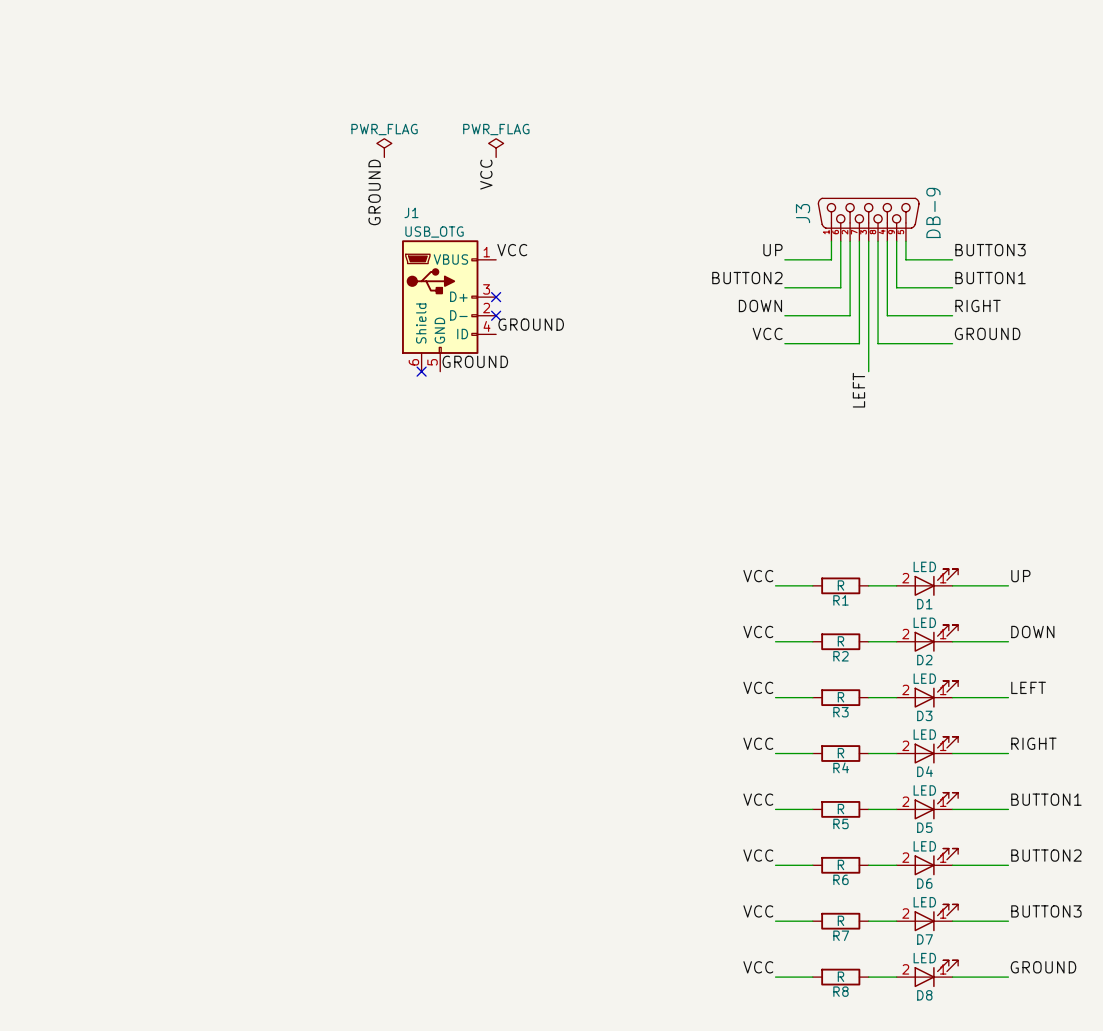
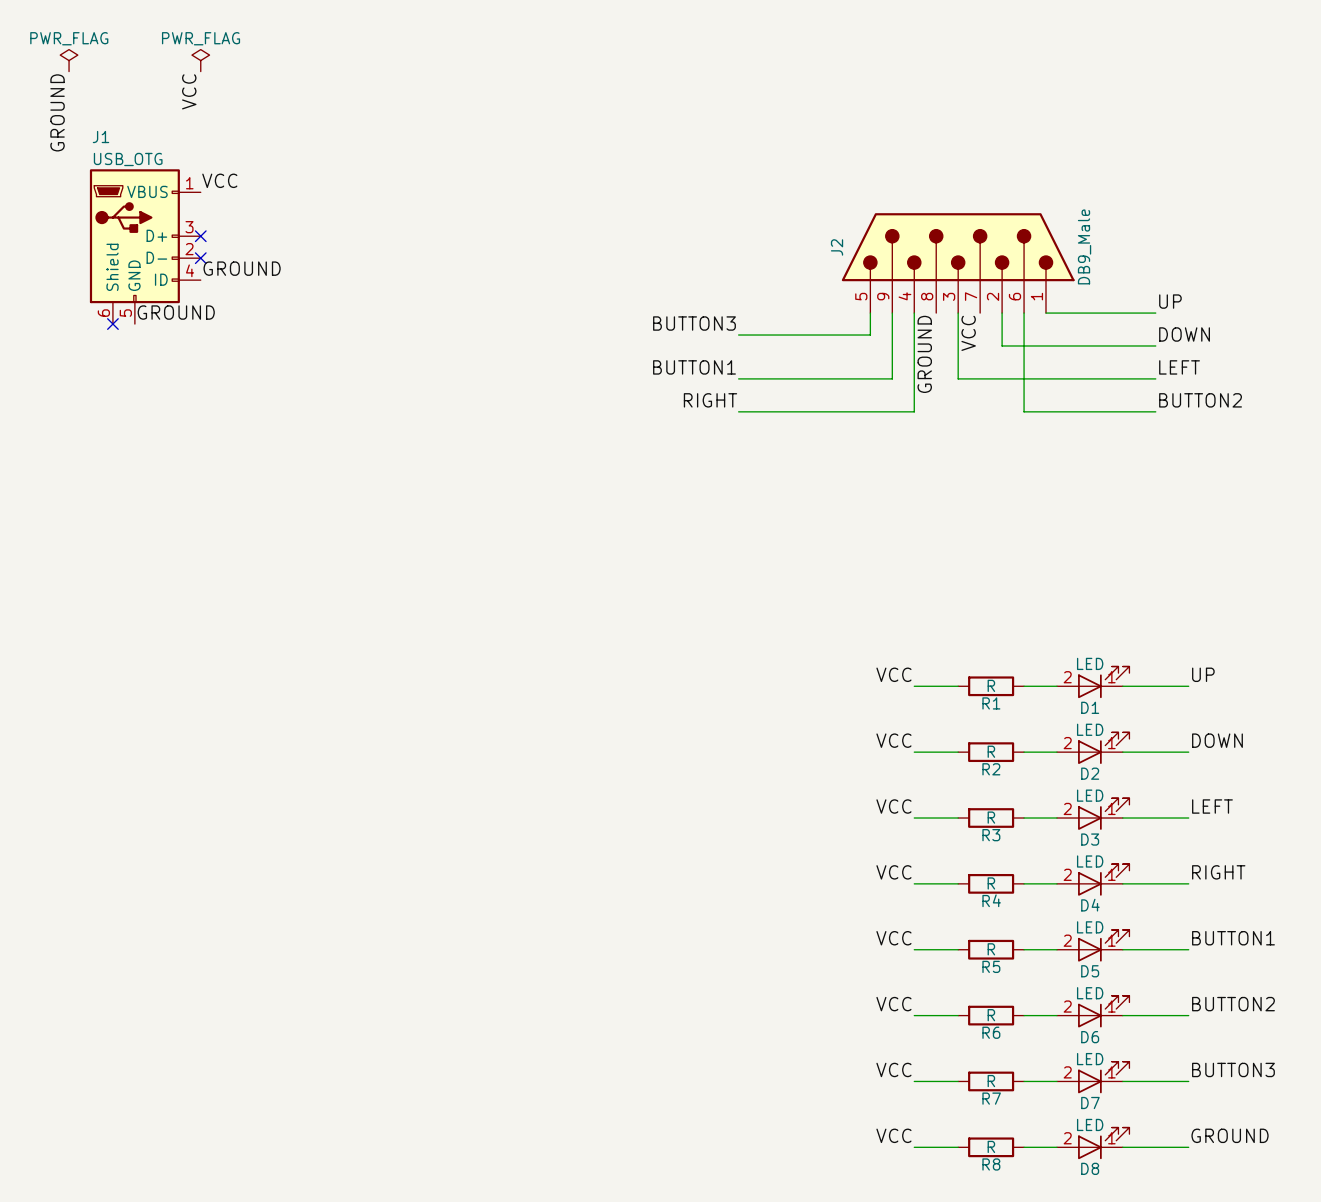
power symbol: none -> PWR_FLAG (69, 60)
power symbol: none -> PWR_FLAG (200, 60)
label: none -> VCC (189, 91)
label: none -> GROUND (57, 112)
power symbol: PWR_FLAG (384, 148) -> none
power symbol: PWR_FLAG (496, 148) -> none
label: none -> VCC (219, 180)
label: VCC (486, 174) -> none
label: GROUND (374, 192) -> none
no-connect mark: none -> (200, 236)
J3: DB-9 (868, 219) -> none
no-connect mark: none -> (200, 258)
J2: none -> DB9_Male (958, 263)
label: none -> GROUND (242, 268)
wire: (831, 241) (831, 259) (784, 259) -> none
wire: (840, 241) (840, 287) (784, 287) -> none
wire: (859, 241) (859, 343) (784, 343) -> none
wire: (878, 241) (878, 343) (952, 343) -> none
wire: (887, 241) (887, 315) (952, 315) -> none
wire: (896, 241) (896, 287) (952, 287) -> none
wire: (905, 241) (905, 259) (952, 259) -> none
label: VCC (512, 250) -> none
label: UP (772, 250) -> none
label: BUTTON3 (990, 250) -> none
label: none -> UP (1170, 301)
label: none -> GROUND (176, 312)
wire: none -> (870, 313) (870, 335) (738, 335)
wire: none -> (892, 313) (892, 378) (738, 378)
wire: none -> (914, 313) (914, 411) (738, 411)
wire: none -> (958, 313) (958, 378) (1155, 378)
wire: none -> (1046, 313) (1155, 313)
no-connect mark: none -> (112, 324)
label: none -> BUTTON3 (694, 323)
label: BUTTON2 (747, 278) -> none
label: BUTTON1 (990, 278) -> none
label: none -> DOWN (1184, 334)
no-connect mark: (496, 297) -> none
wire: (850, 297) (850, 315) (784, 315) -> (1002, 345) (1155, 345)
label: none -> GROUND (924, 354)
J1 position: (449, 305) -> (145, 246)
label: DOWN (760, 305) -> none
label: RIGHT (978, 305) -> none
no-connect mark: (496, 315) -> none
label: none -> BUTTON1 (694, 367)
label: GROUND (531, 324) -> none
label rotation: 0° (767, 333) -> 90° counterclockwise (968, 333)
label position: VCC (767, 333) -> VCC (968, 333)
label: GROUND (987, 333) -> none
label: none -> RIGHT (710, 400)
label: none -> BUTTON2 (1200, 400)
wire: (868, 352) (868, 371) -> (1024, 411) (1155, 411)
label: GROUND (475, 361) -> none
no-connect mark: (421, 371) -> none
label rotation: 0° (858, 390) -> 90° clockwise (1179, 367)
label position: LEFT (858, 390) -> LEFT (1179, 367)

